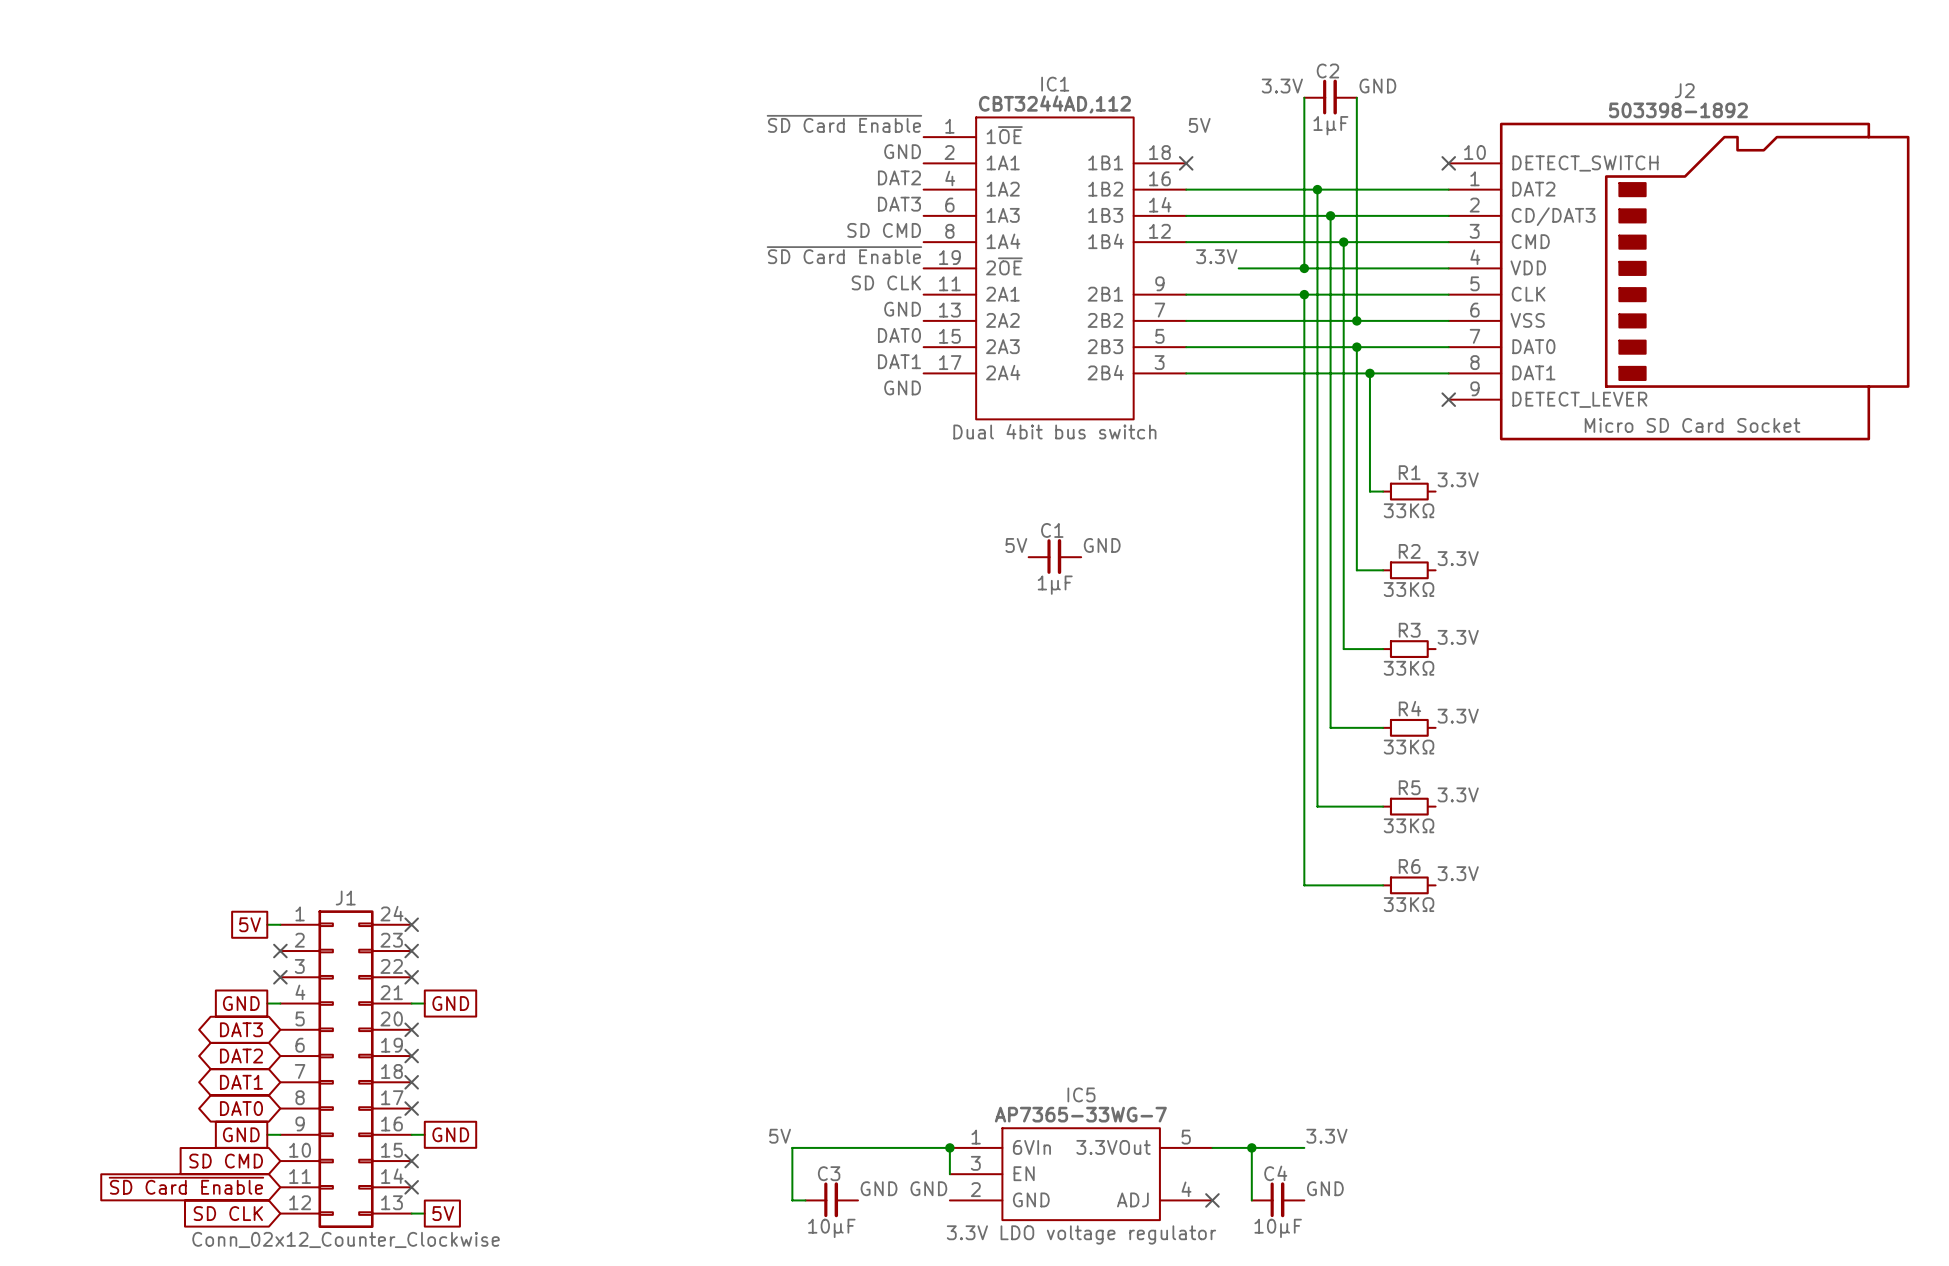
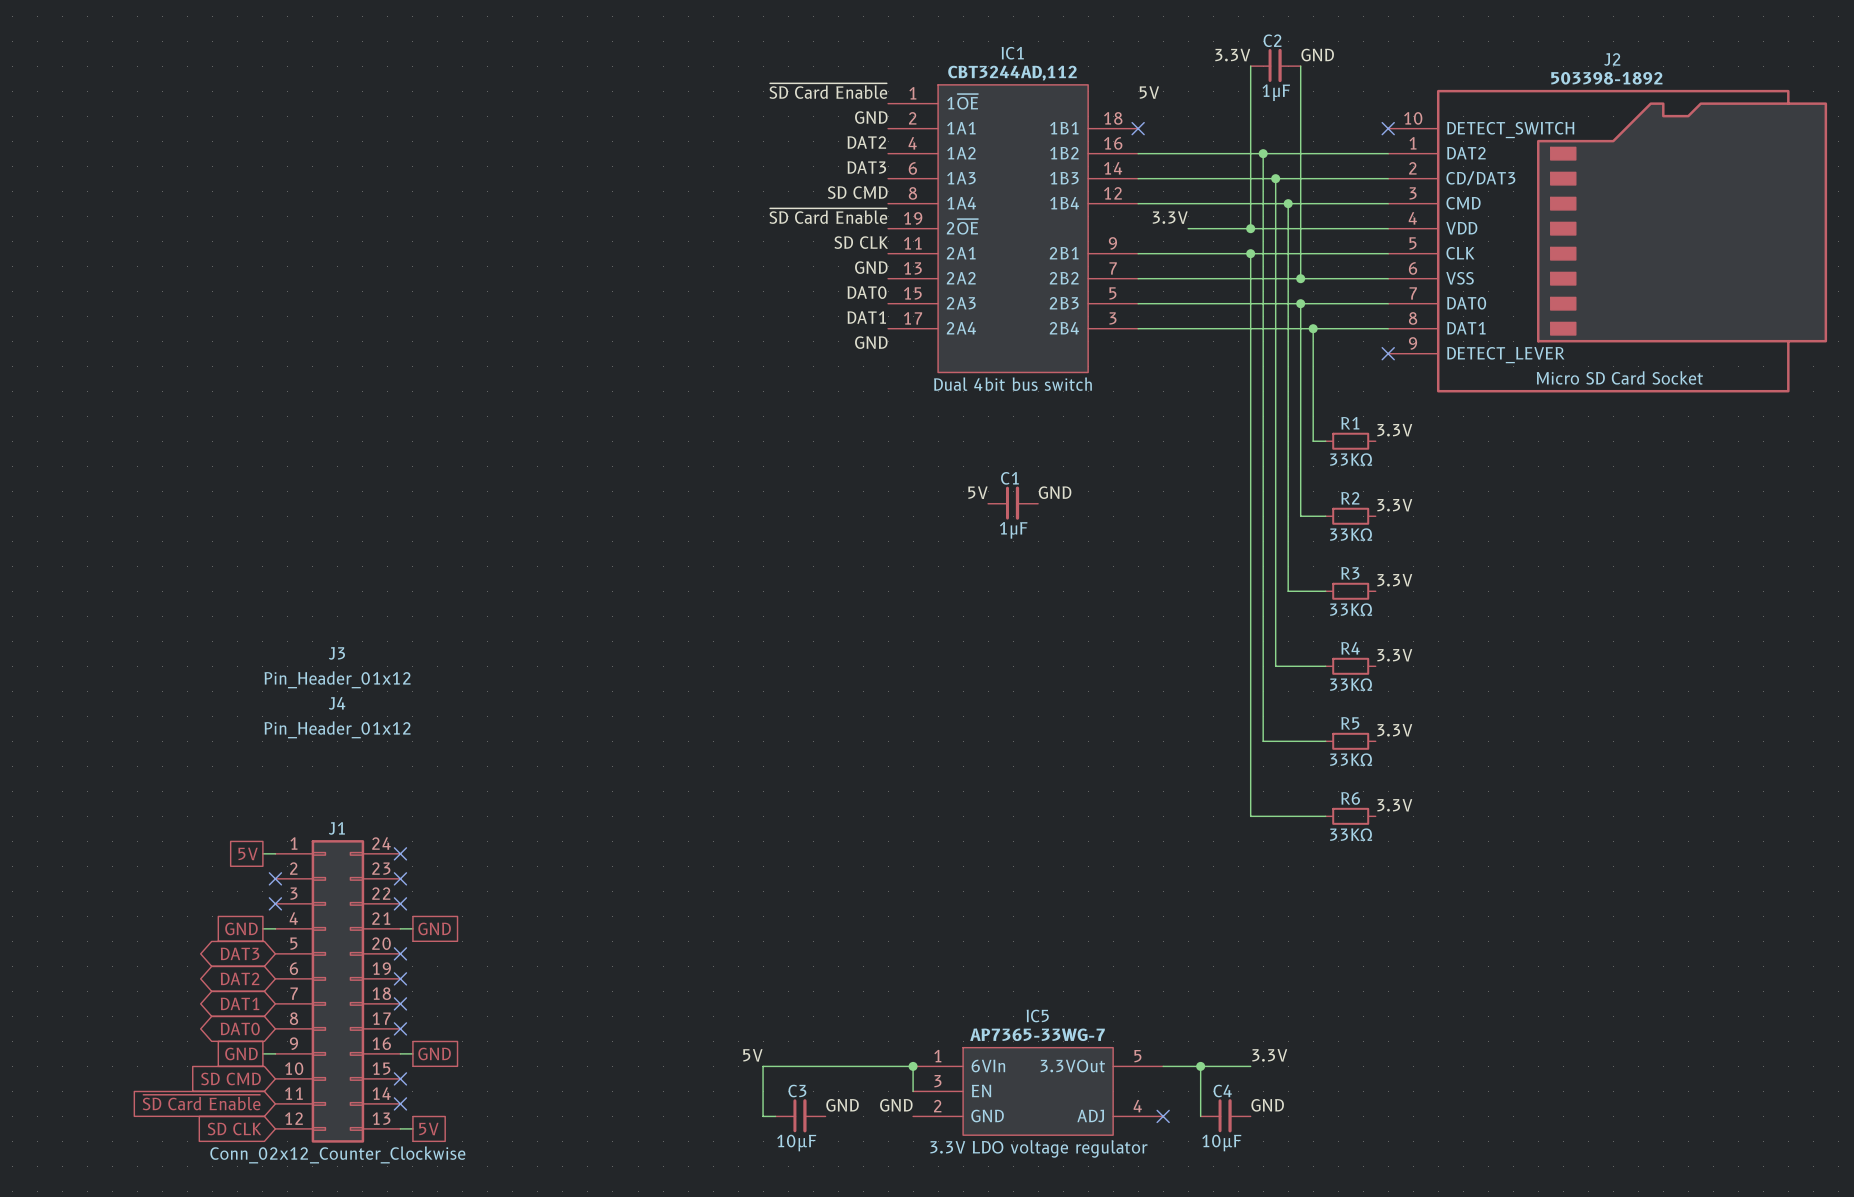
J3: none -> Pin_Header_01x12 (337, 667)
J4: none -> Pin_Header_01x12 (337, 717)

